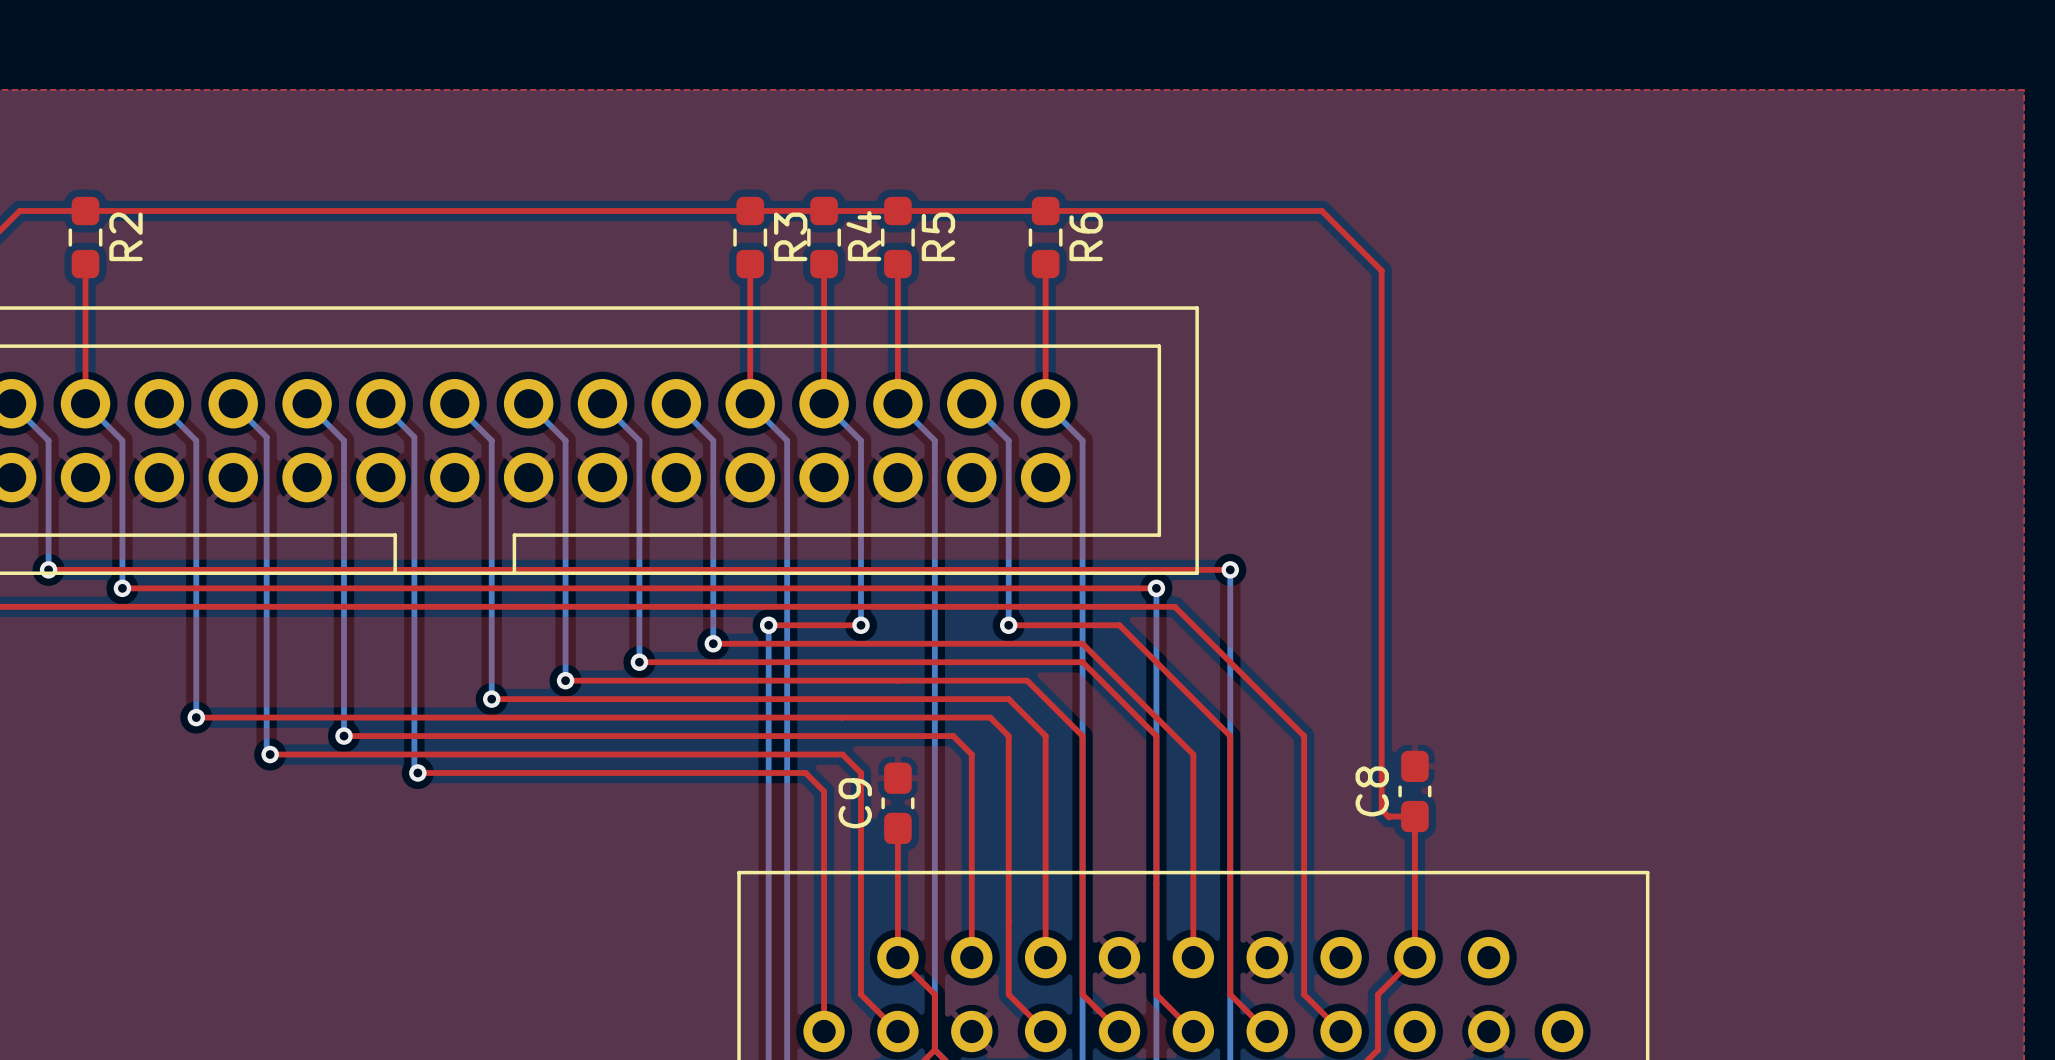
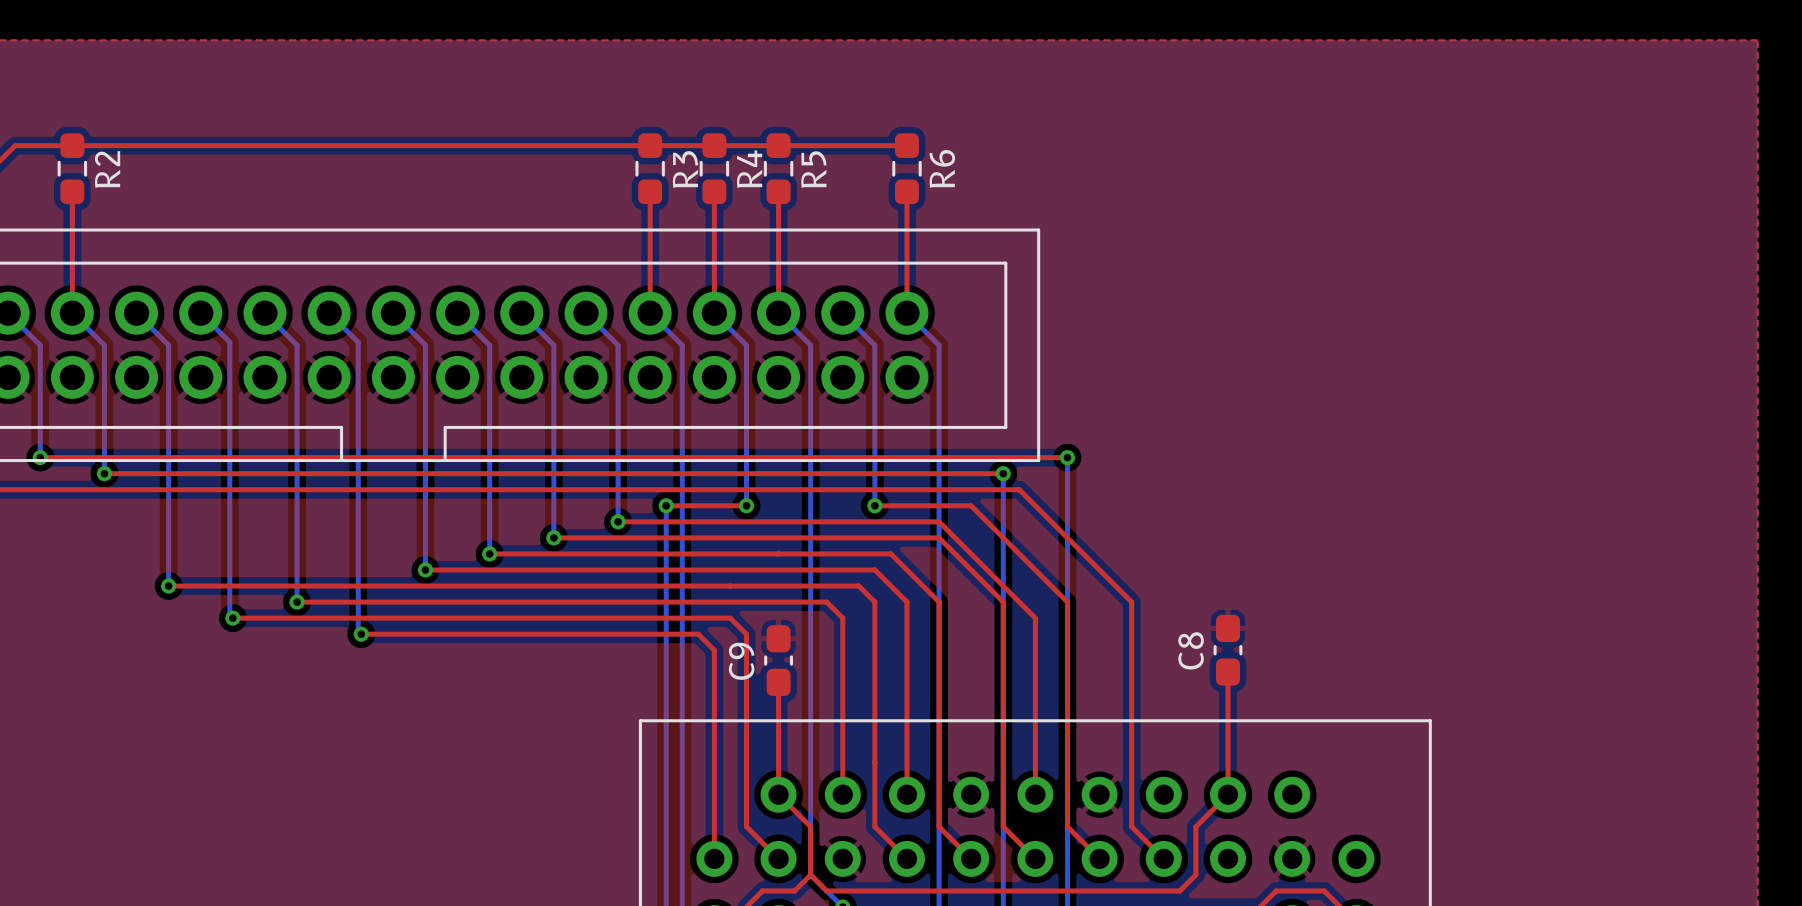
top track: (1045, 211) (1321, 211) (1381, 270) (1381, 809) (1389, 817) (1414, 816) -> none

